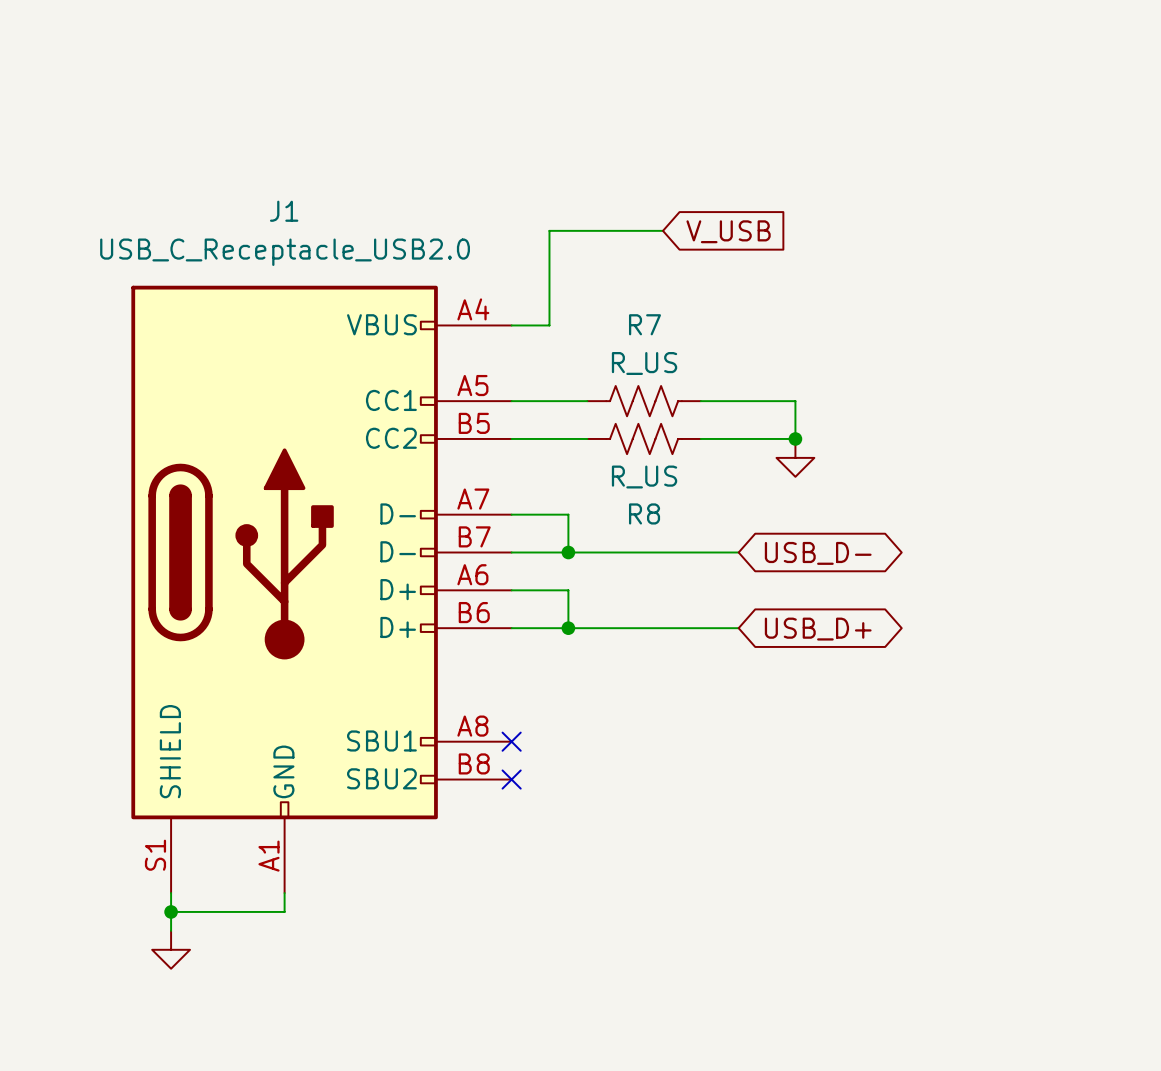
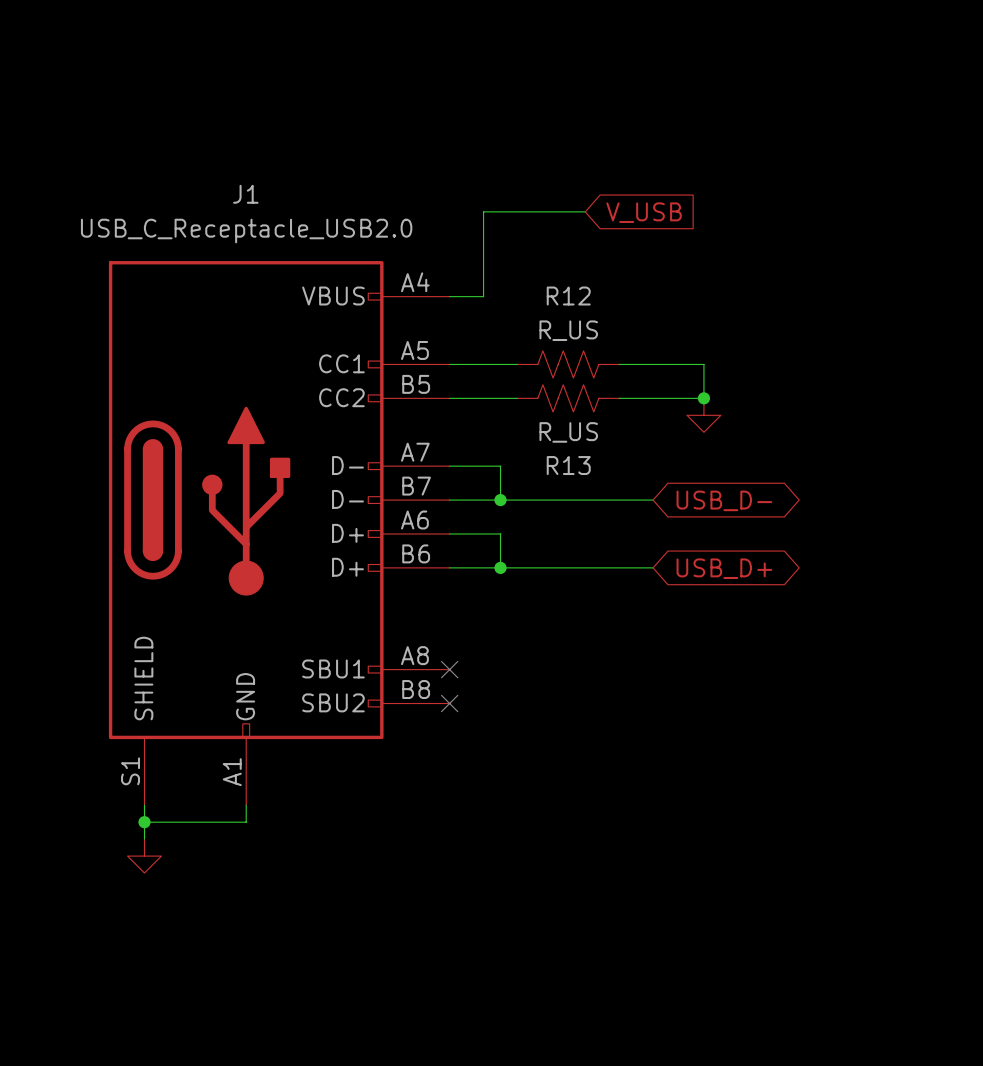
R7 name: R7 (644, 324) -> R12 (568, 296)
R8 name: R8 (644, 513) -> R13 (568, 465)

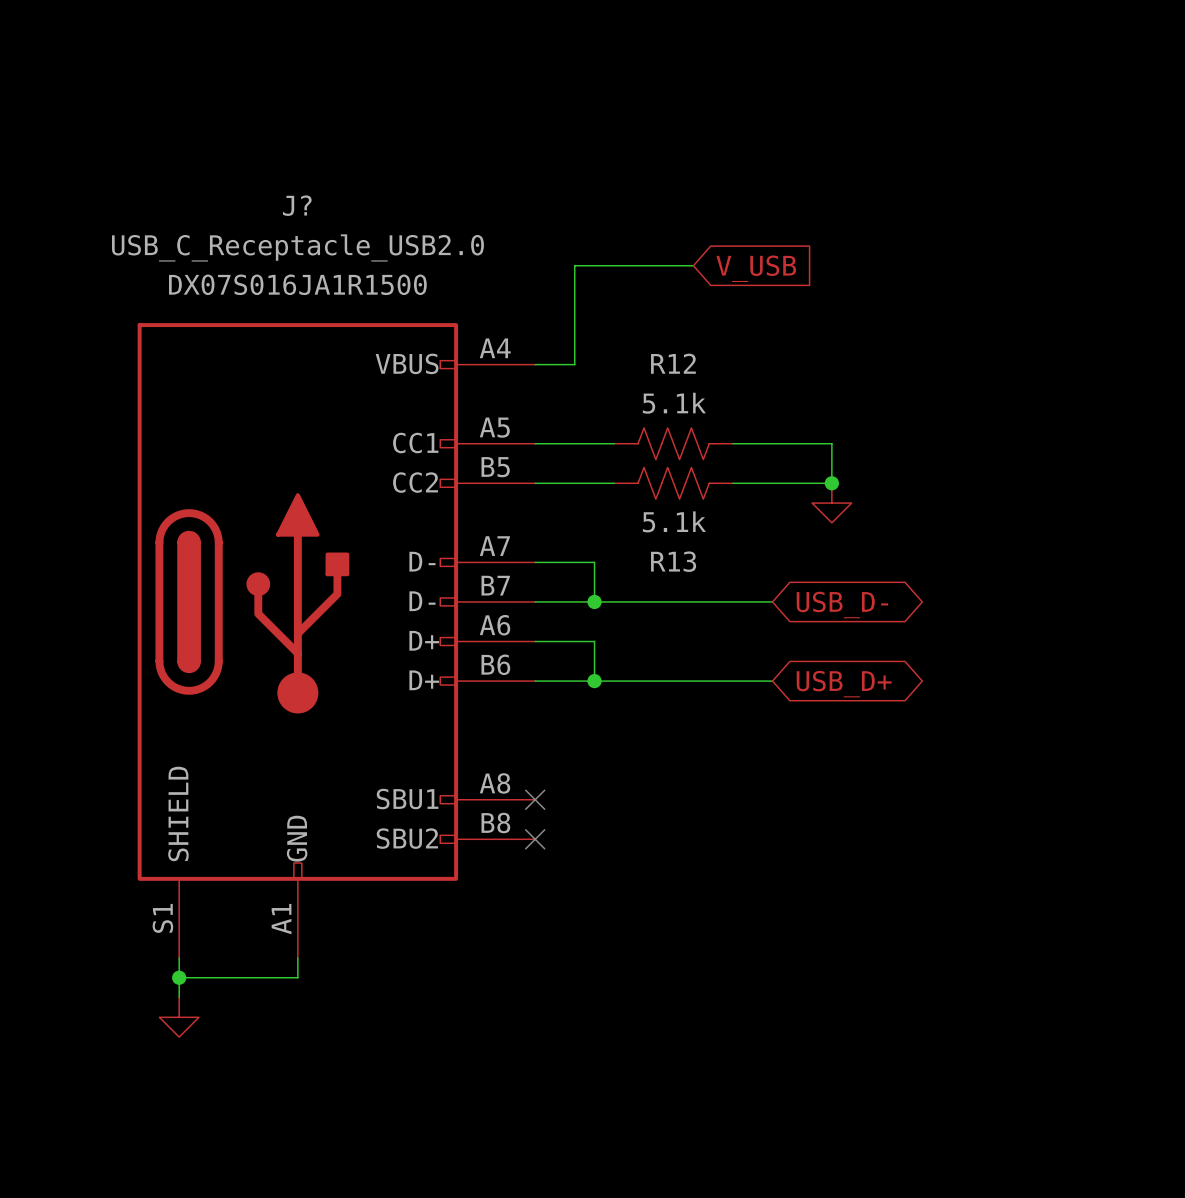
J1 name: J1 (245, 194) -> J? (297, 205)
J1 text: none -> DX07S016JA1R1500 (297, 284)
J1 value position: USB_C_Receptacle_USB2.0 (246, 231) -> USB_C_Receptacle_USB2.0 (297, 247)
R12 value: R_US (568, 330) -> 5.1k (674, 403)
R13 value: R_US (568, 432) -> 5.1k (674, 521)

